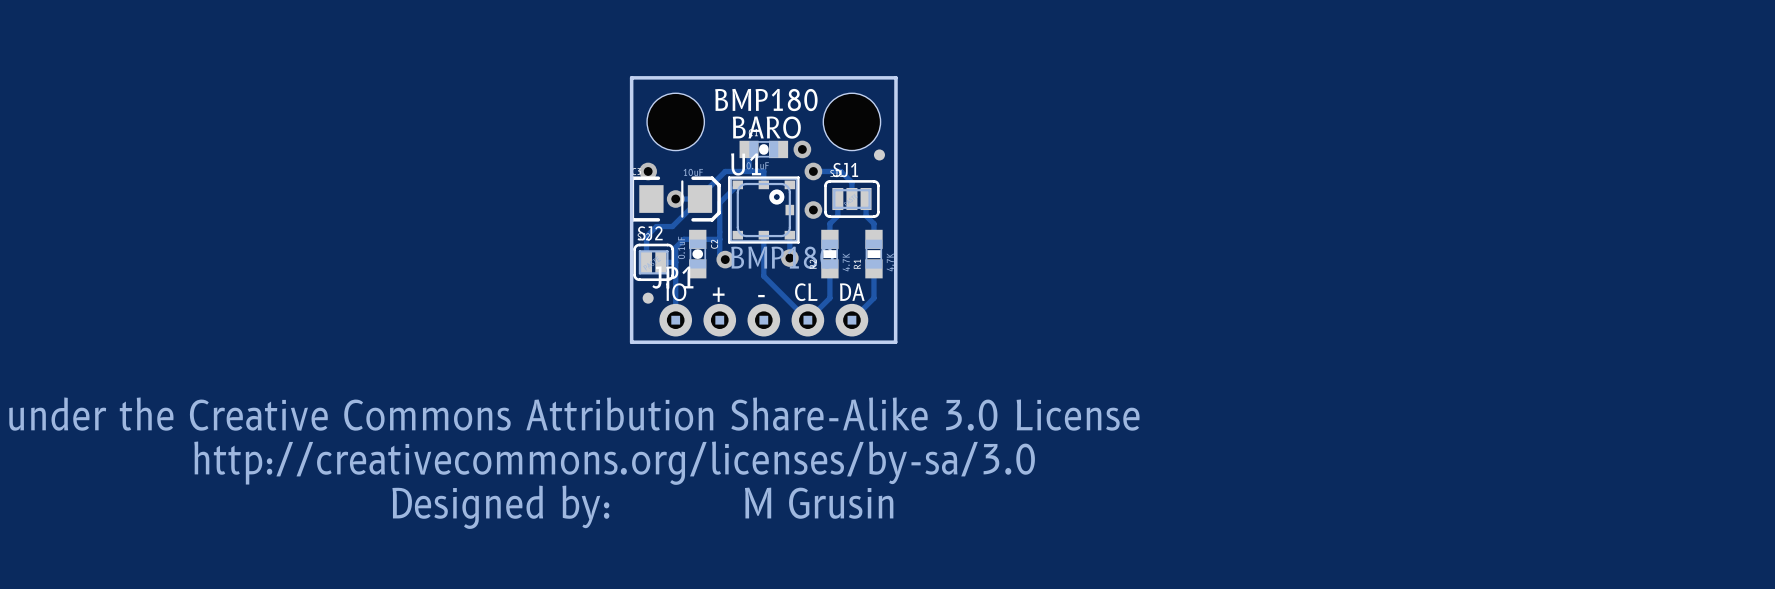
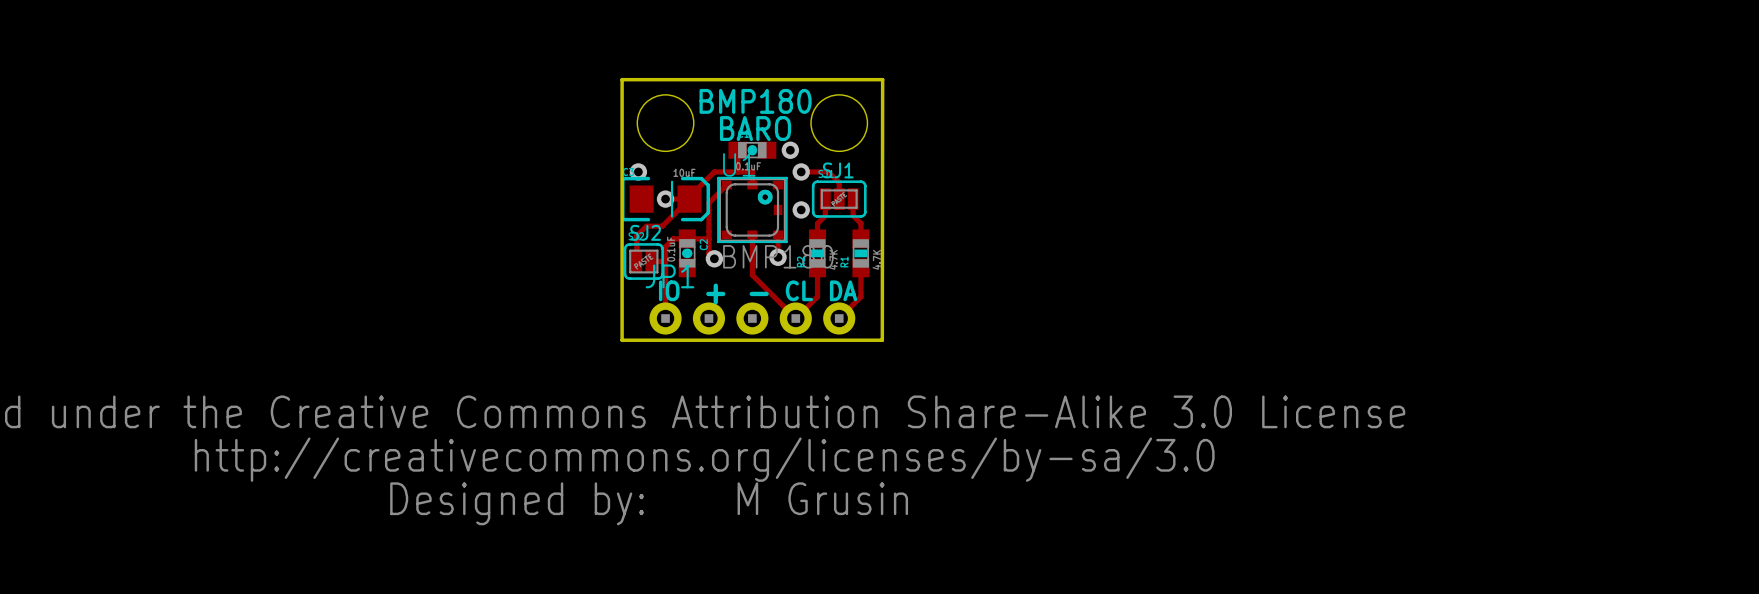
part: (879, 154) -> none
part: (648, 298) -> none

